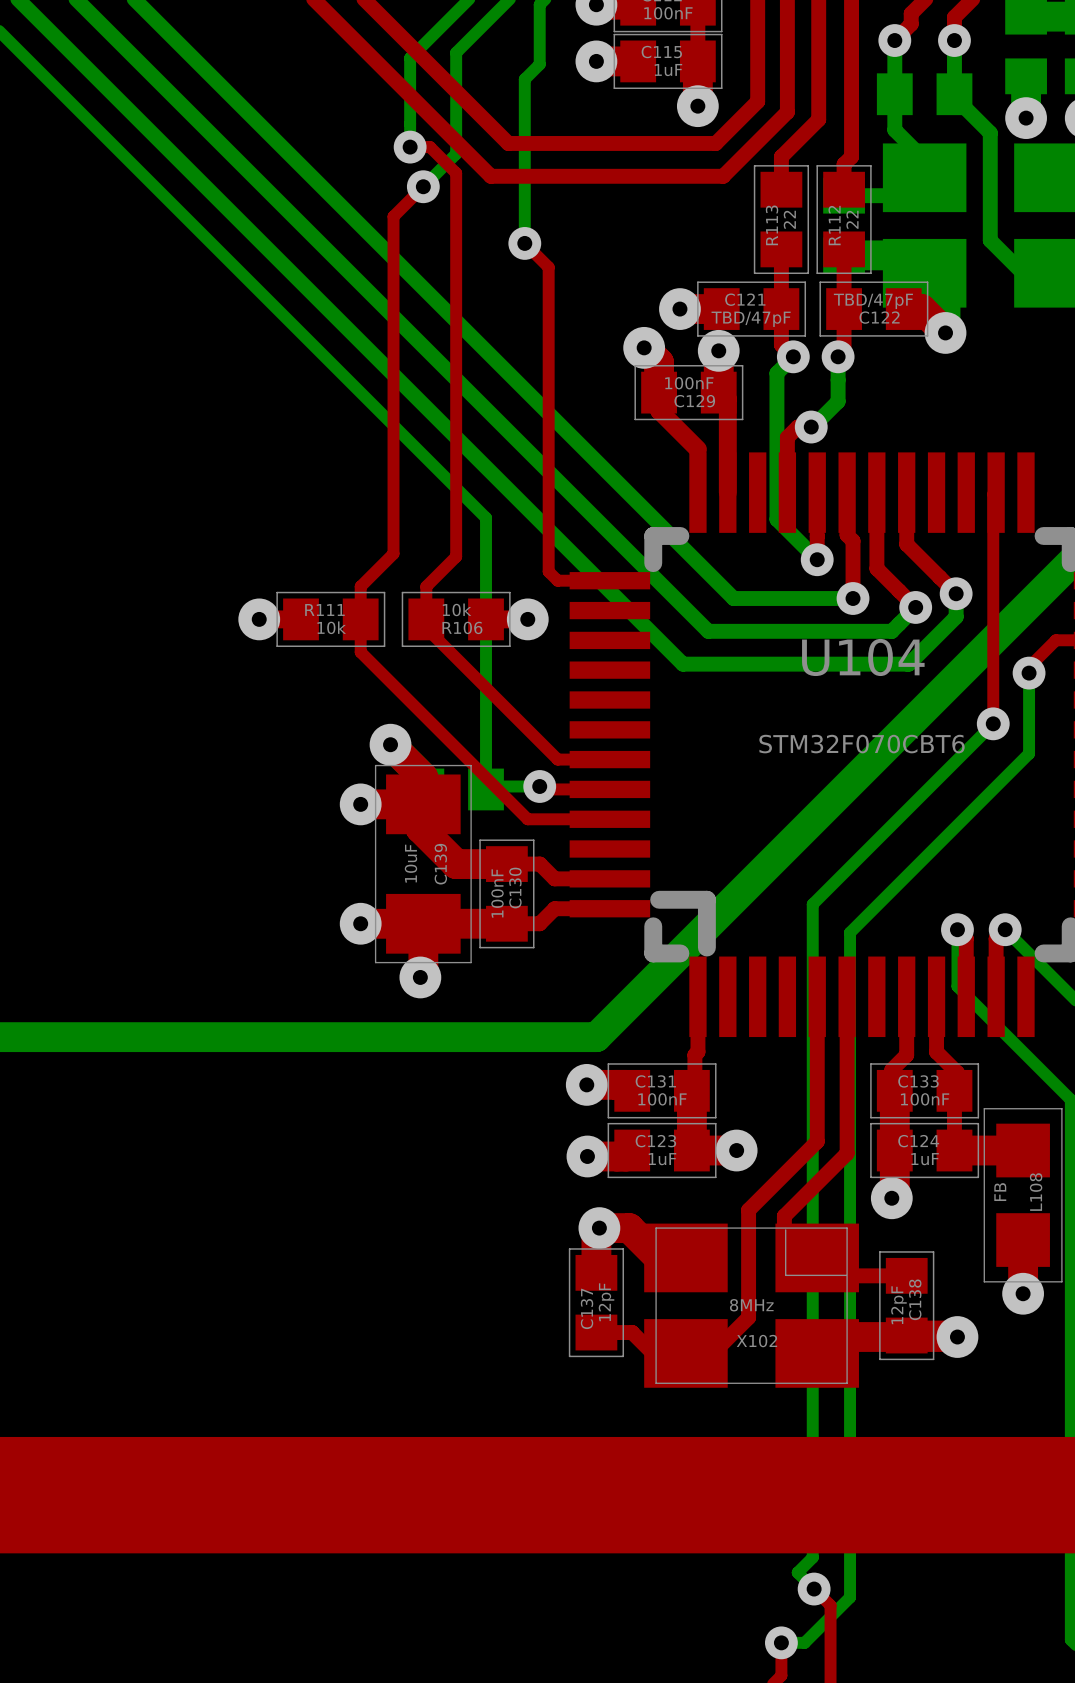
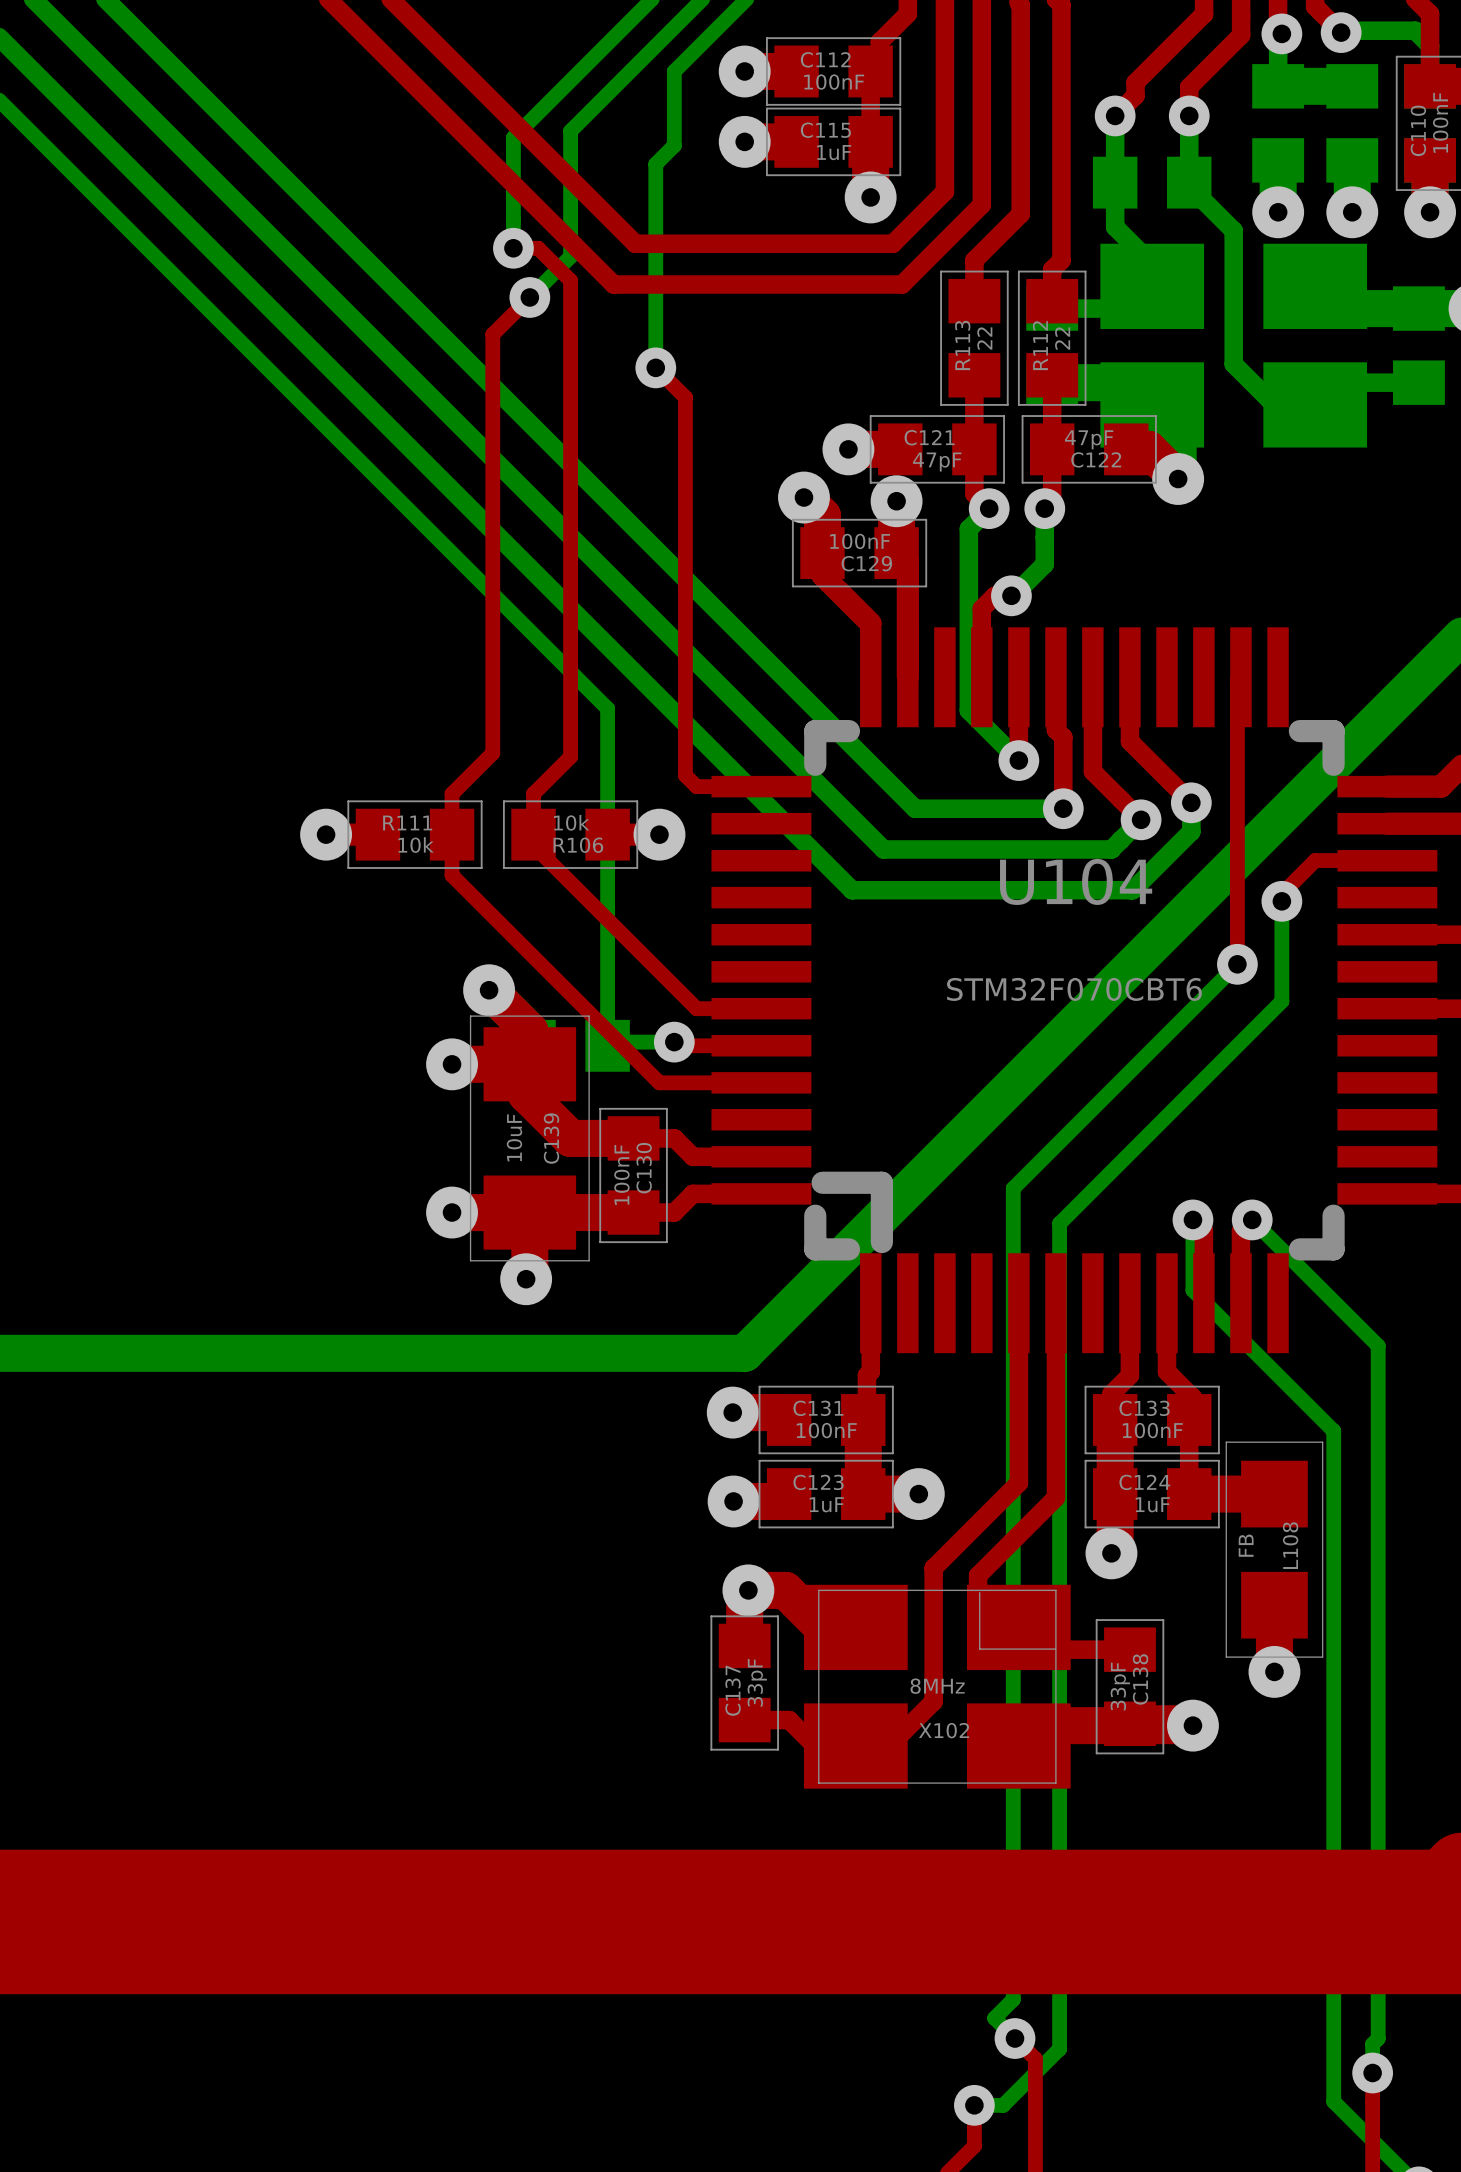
C122 value: TBD/47pF (873, 301) -> 47pF (1089, 439)
C121 value: TBD/47pF (751, 319) -> 47pF (937, 462)
C137 value: 12pF (606, 1302) -> 33pF (757, 1682)
C138 value: 12pF (898, 1305) -> 33pF (1120, 1686)

